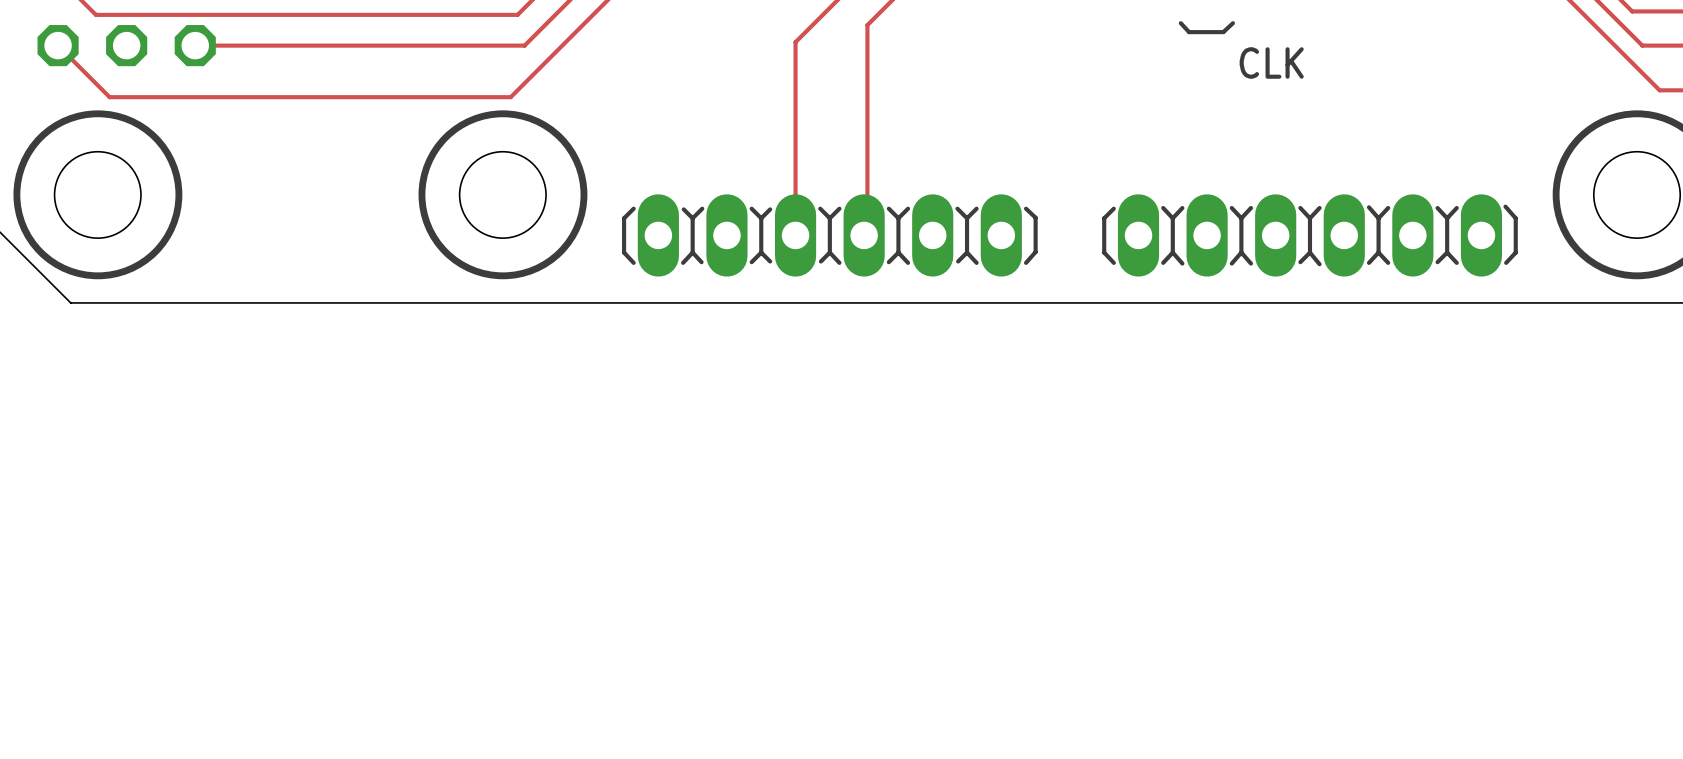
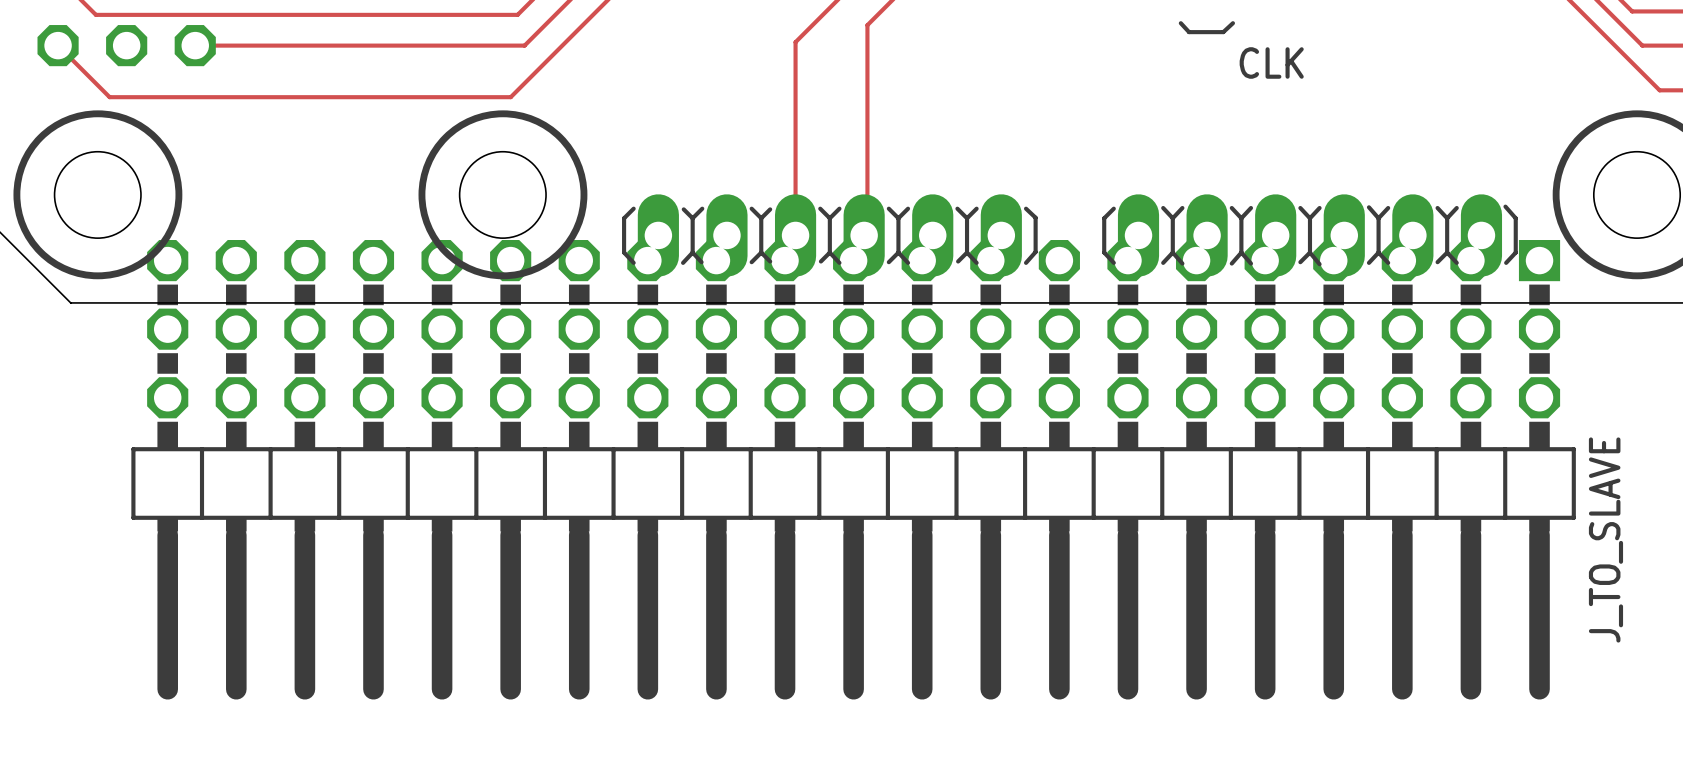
J_TO_SLAVE: none -> (853, 469)

